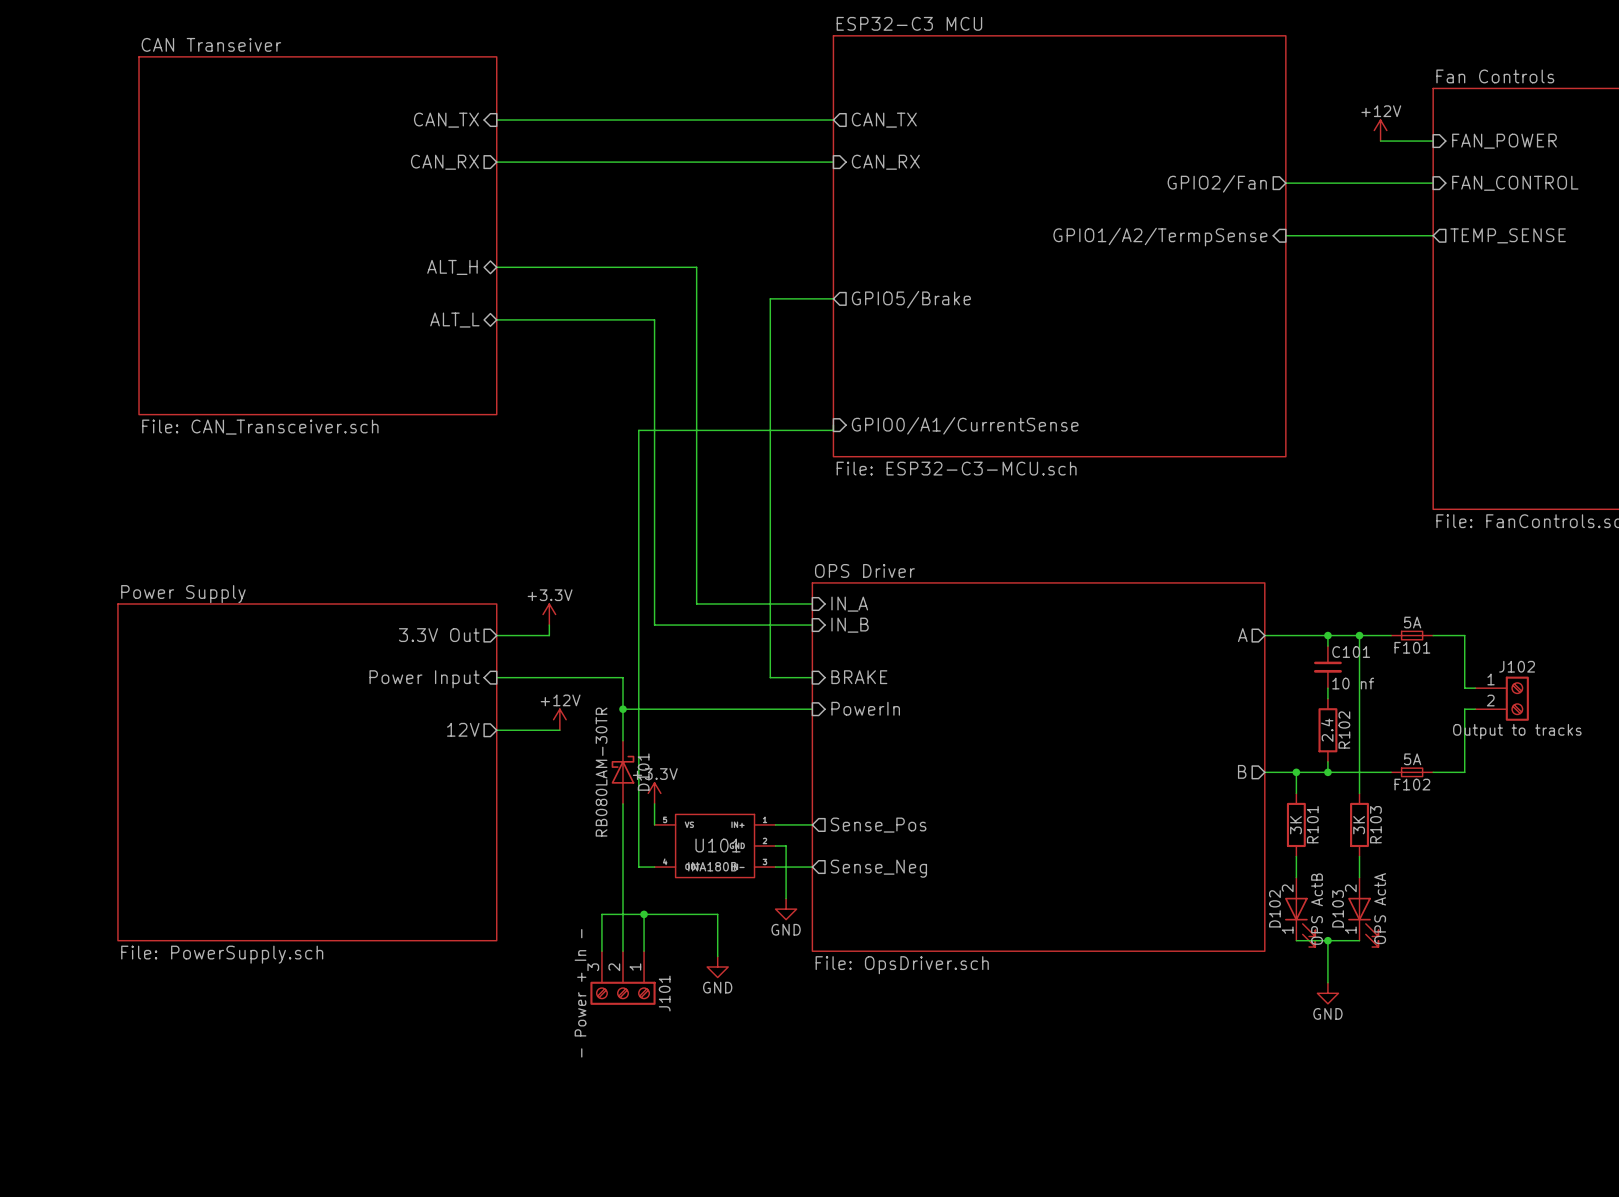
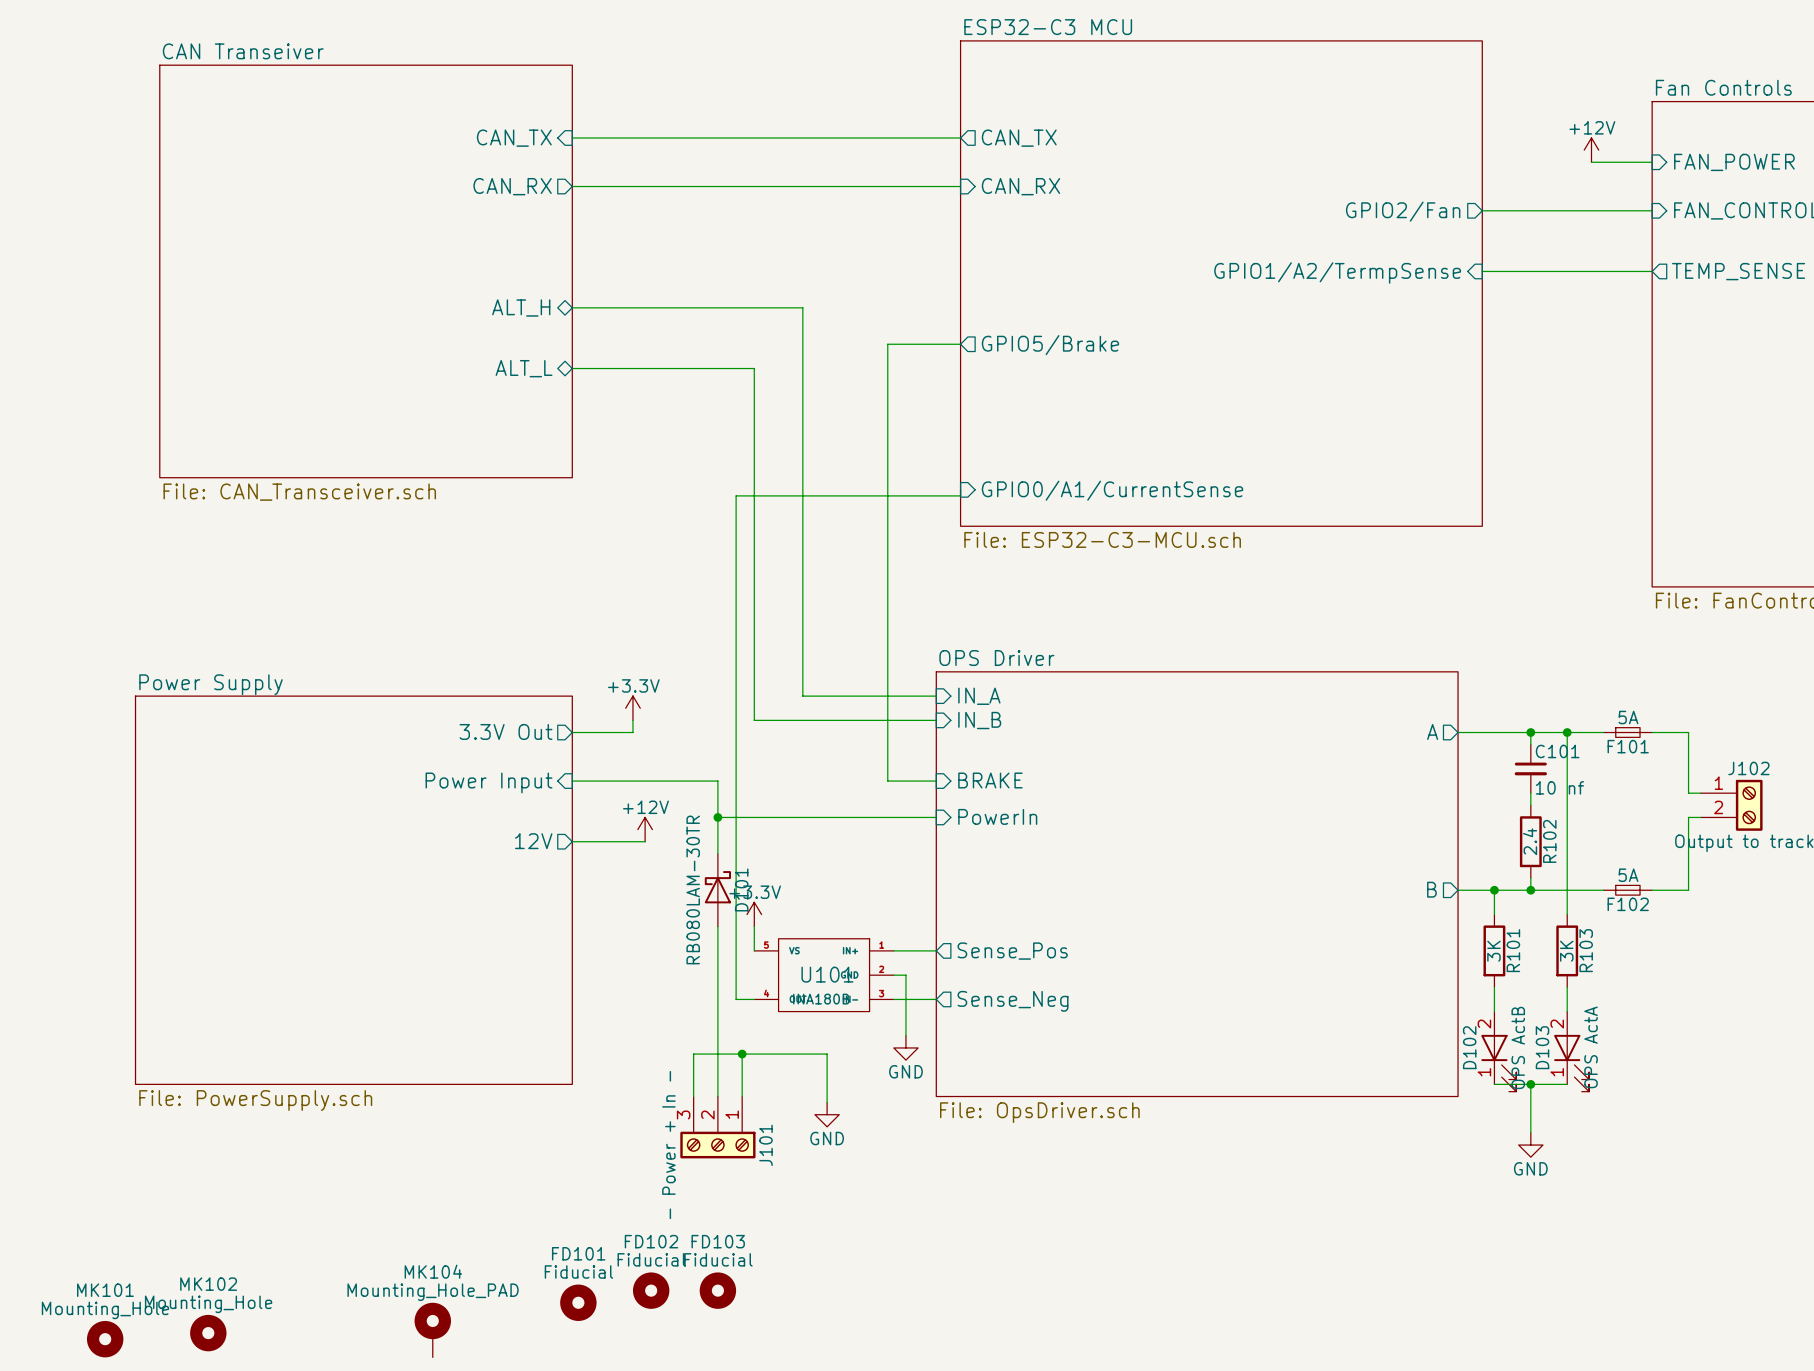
FD102: none -> Fiducial (651, 1290)
FD103: none -> Fiducial (717, 1290)
FD101: none -> Fiducial (578, 1302)
MK104: none -> Mounting_Hole_PAD (432, 1330)
MK102: none -> Mounting_Hole (208, 1333)
MK101: none -> Mounting_Hole (105, 1339)

